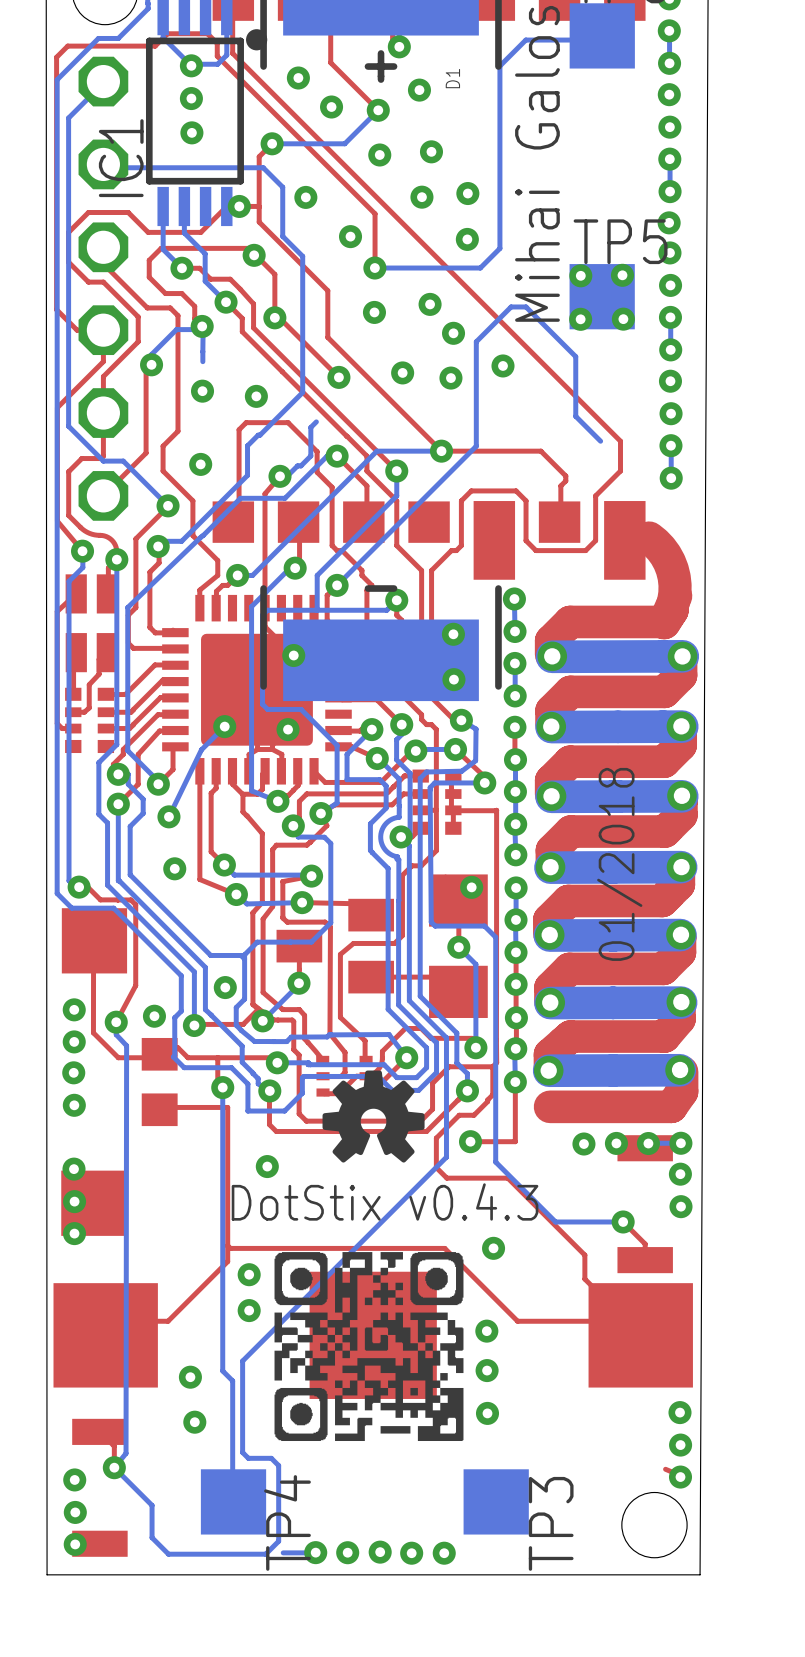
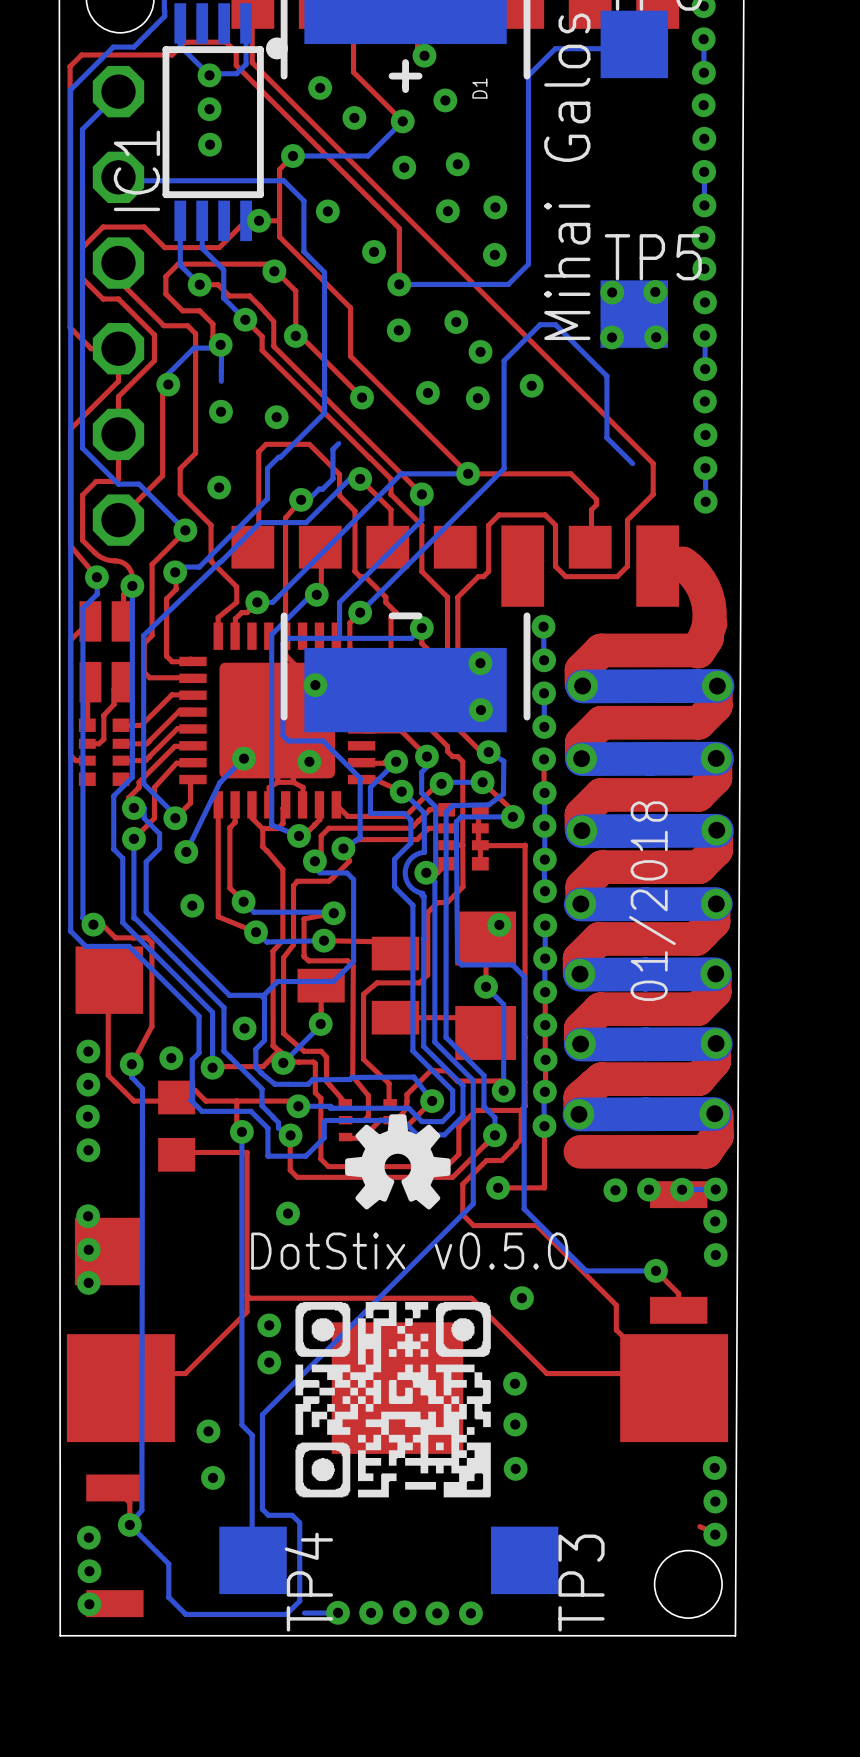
text: DotStix v0.4.3 (385, 1201) -> DotStix v0.5.0 (409, 1251)

